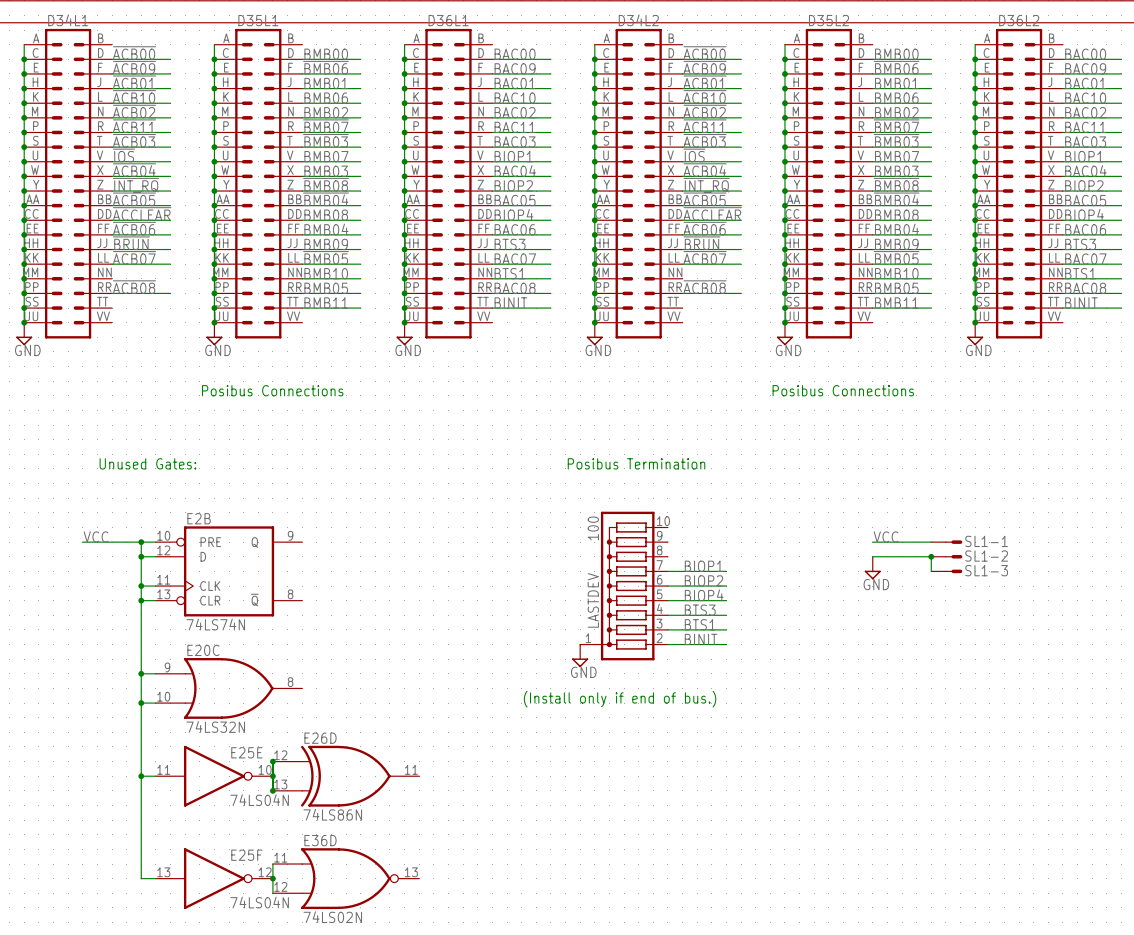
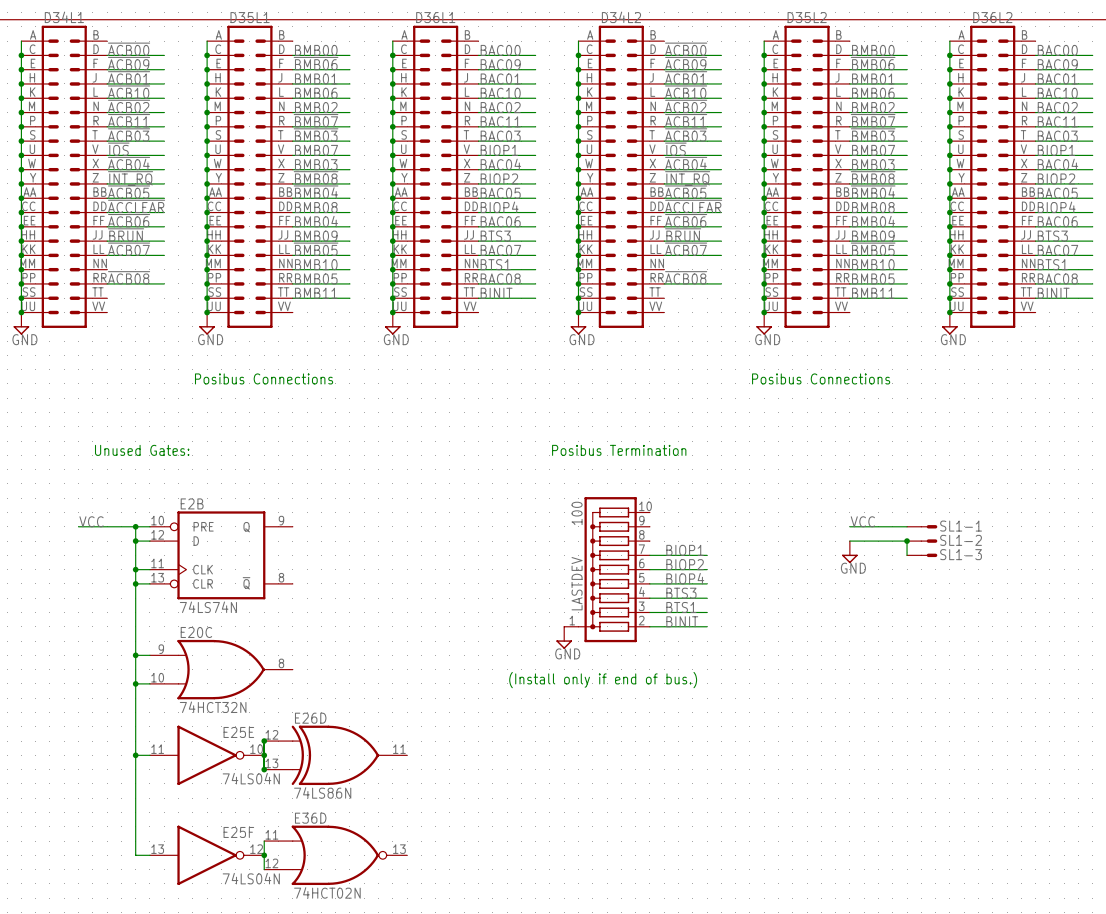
E20C value: 74LS32N (215, 726) -> 74HCT32N (213, 707)
E36D value: 74LS02N (332, 917) -> 74HCT02N (327, 892)

